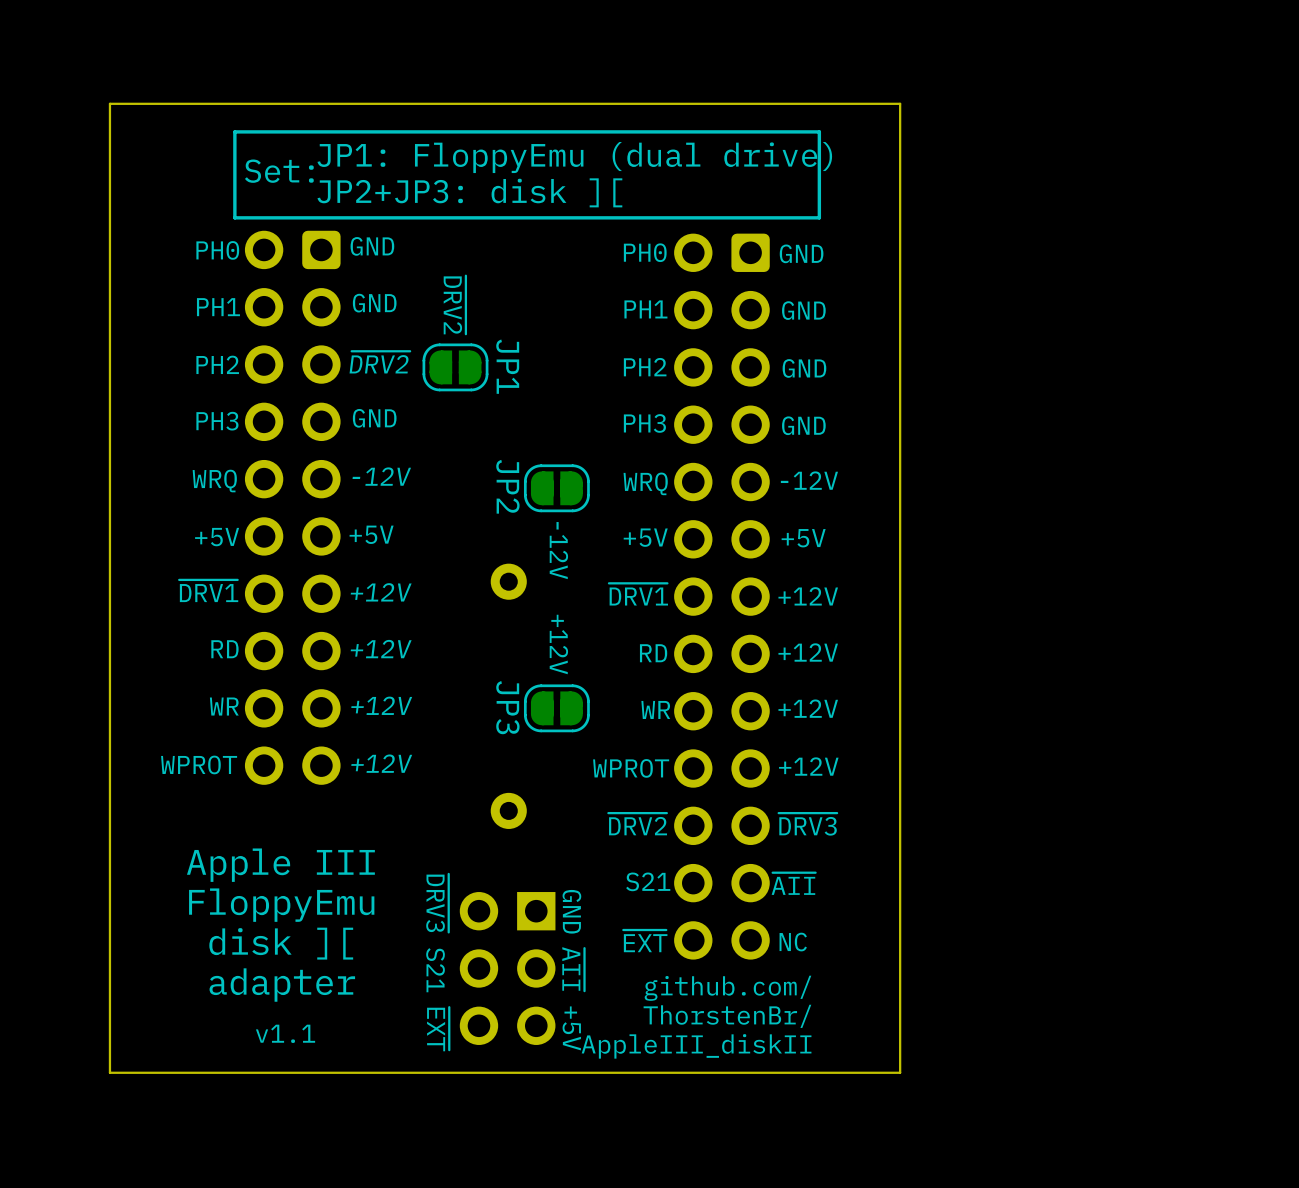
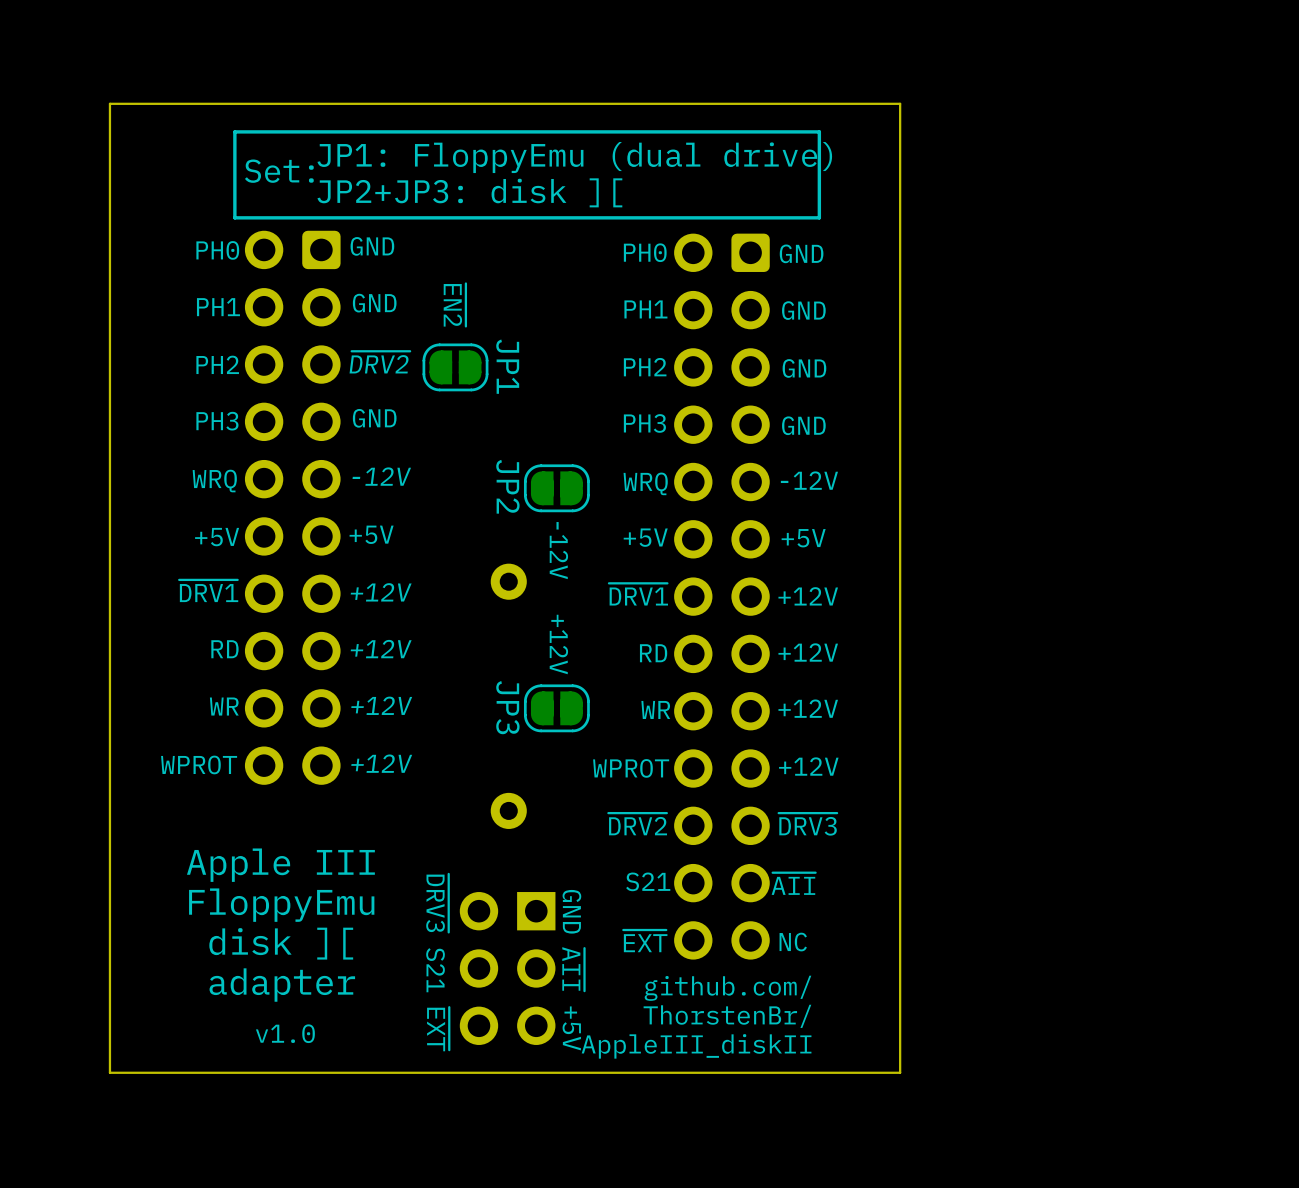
JP1 value: ~{DRV2} (454, 305) -> ~{EN2} (454, 305)
text: v1.1 (285, 1033) -> v1.0 (285, 1033)

